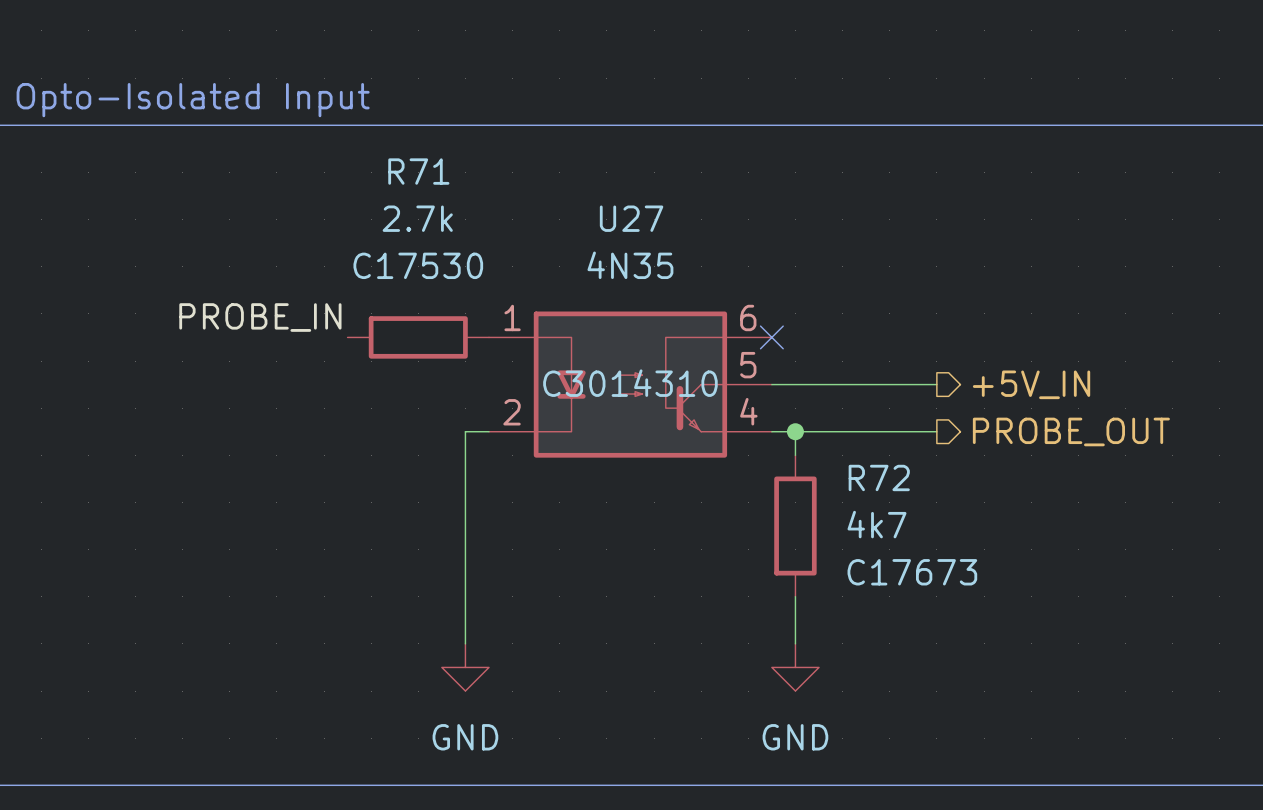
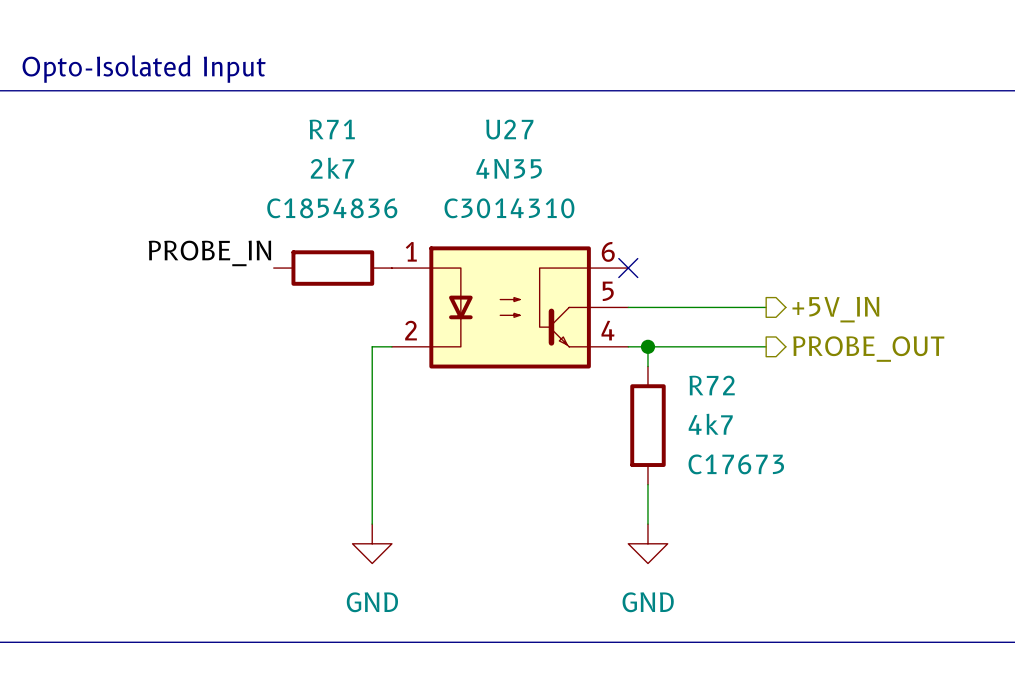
R71 value: 2.7k (417, 218) -> 2k7 (332, 168)
U27 name position: U27 (631, 218) -> U27 (509, 129)
R71 text: C17530 (418, 265) -> C1854836 (332, 208)
U27 value position: 4N35 (630, 265) -> 4N35 (509, 168)
U27 text position: C3014310 (630, 383) -> C3014310 (509, 208)

